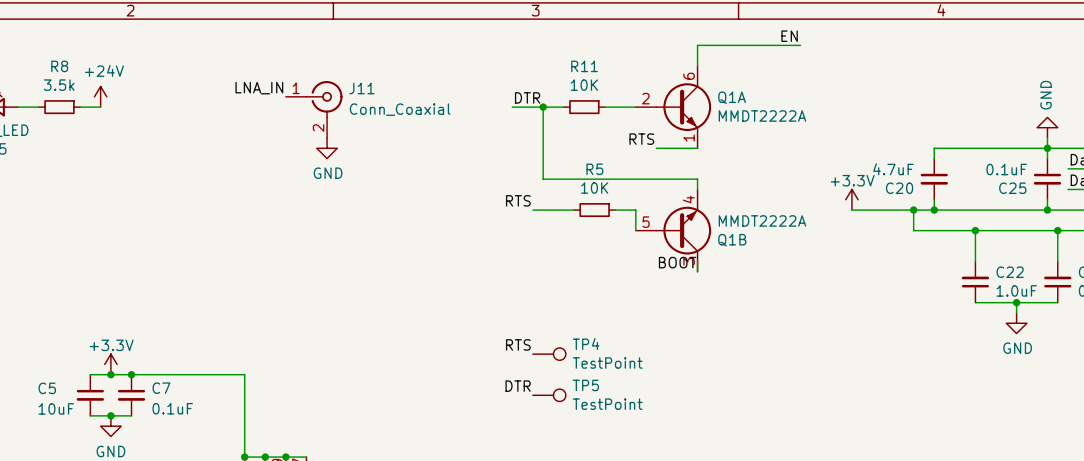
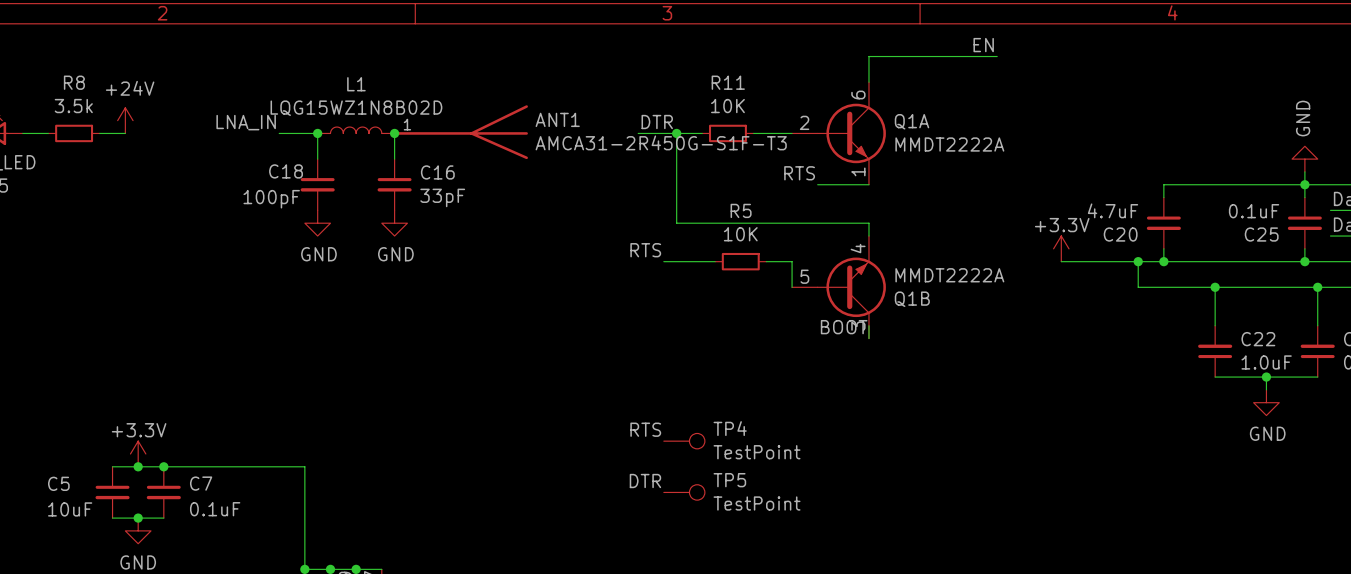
label position: LNA_IN (259, 88) -> LNA_IN (246, 122)
L1: none -> LQG15WZ1N8B02D (356, 130)
ANT1: none -> AMCA31-2R450G-S1F-T3 (460, 132)
wire: none -> (279, 133) (317, 133) (317, 159)
junction: none -> (317, 133)
wire: none -> (394, 133) (394, 159)
junction: none -> (394, 133)
J11: Conn_Coaxial (314, 109) -> none
C18: none -> 100pF (317, 184)
C16: none -> 33pF (394, 184)
power symbol position: GND (327, 148) -> GND (394, 223)
power symbol: none -> GND (317, 223)

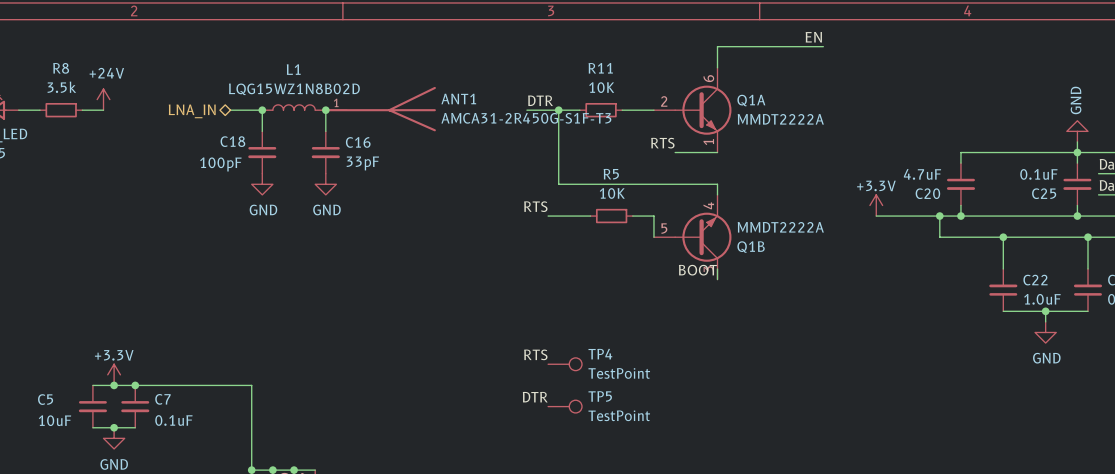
label: LNA_IN (246, 122) -> none
hierarchical label: none -> LNA_IN (192, 111)

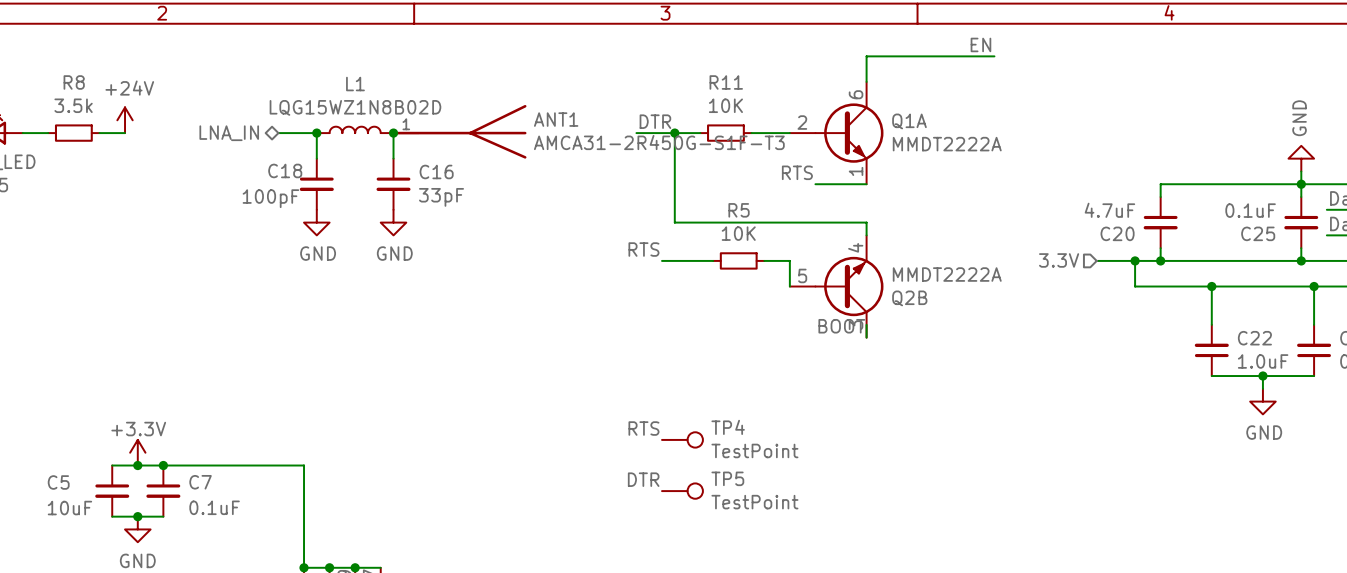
power symbol: +3.3V (876, 205) -> none
hierarchical label: none -> 3.3V (1059, 260)
wire: (876, 216) (908, 216) -> none
Q1B name: Q1B (751, 247) -> Q2B (909, 298)

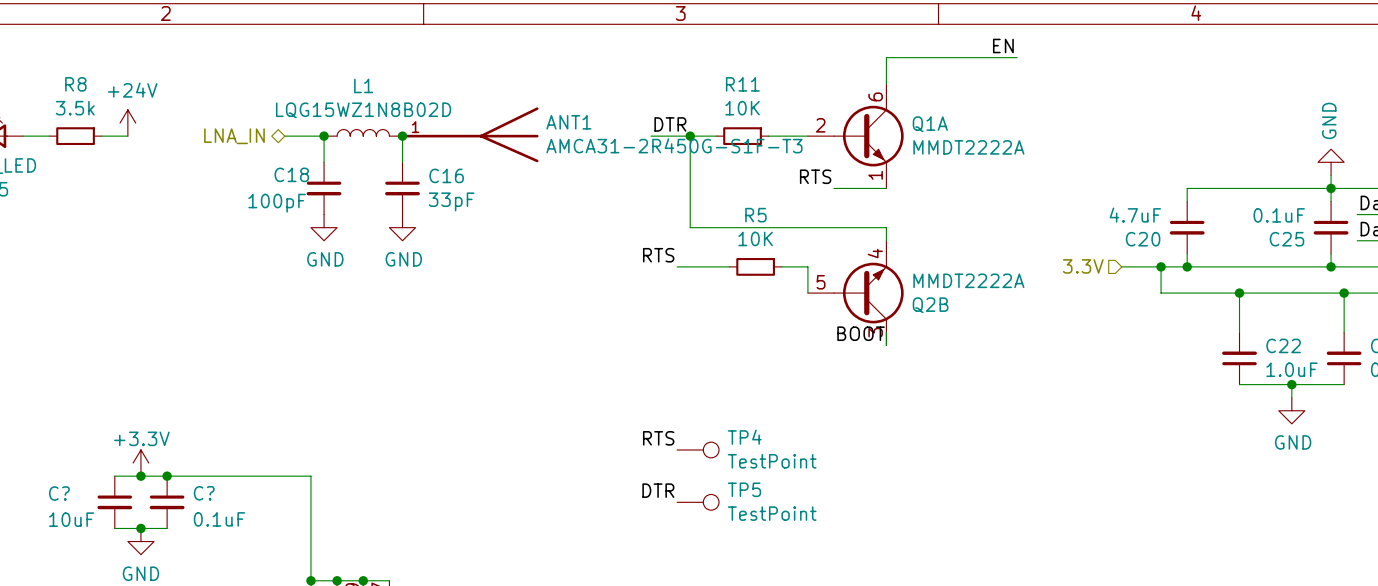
C5 name: C5 (58, 482) -> C? (59, 493)
C7 name: C7 (200, 482) -> C? (204, 493)

